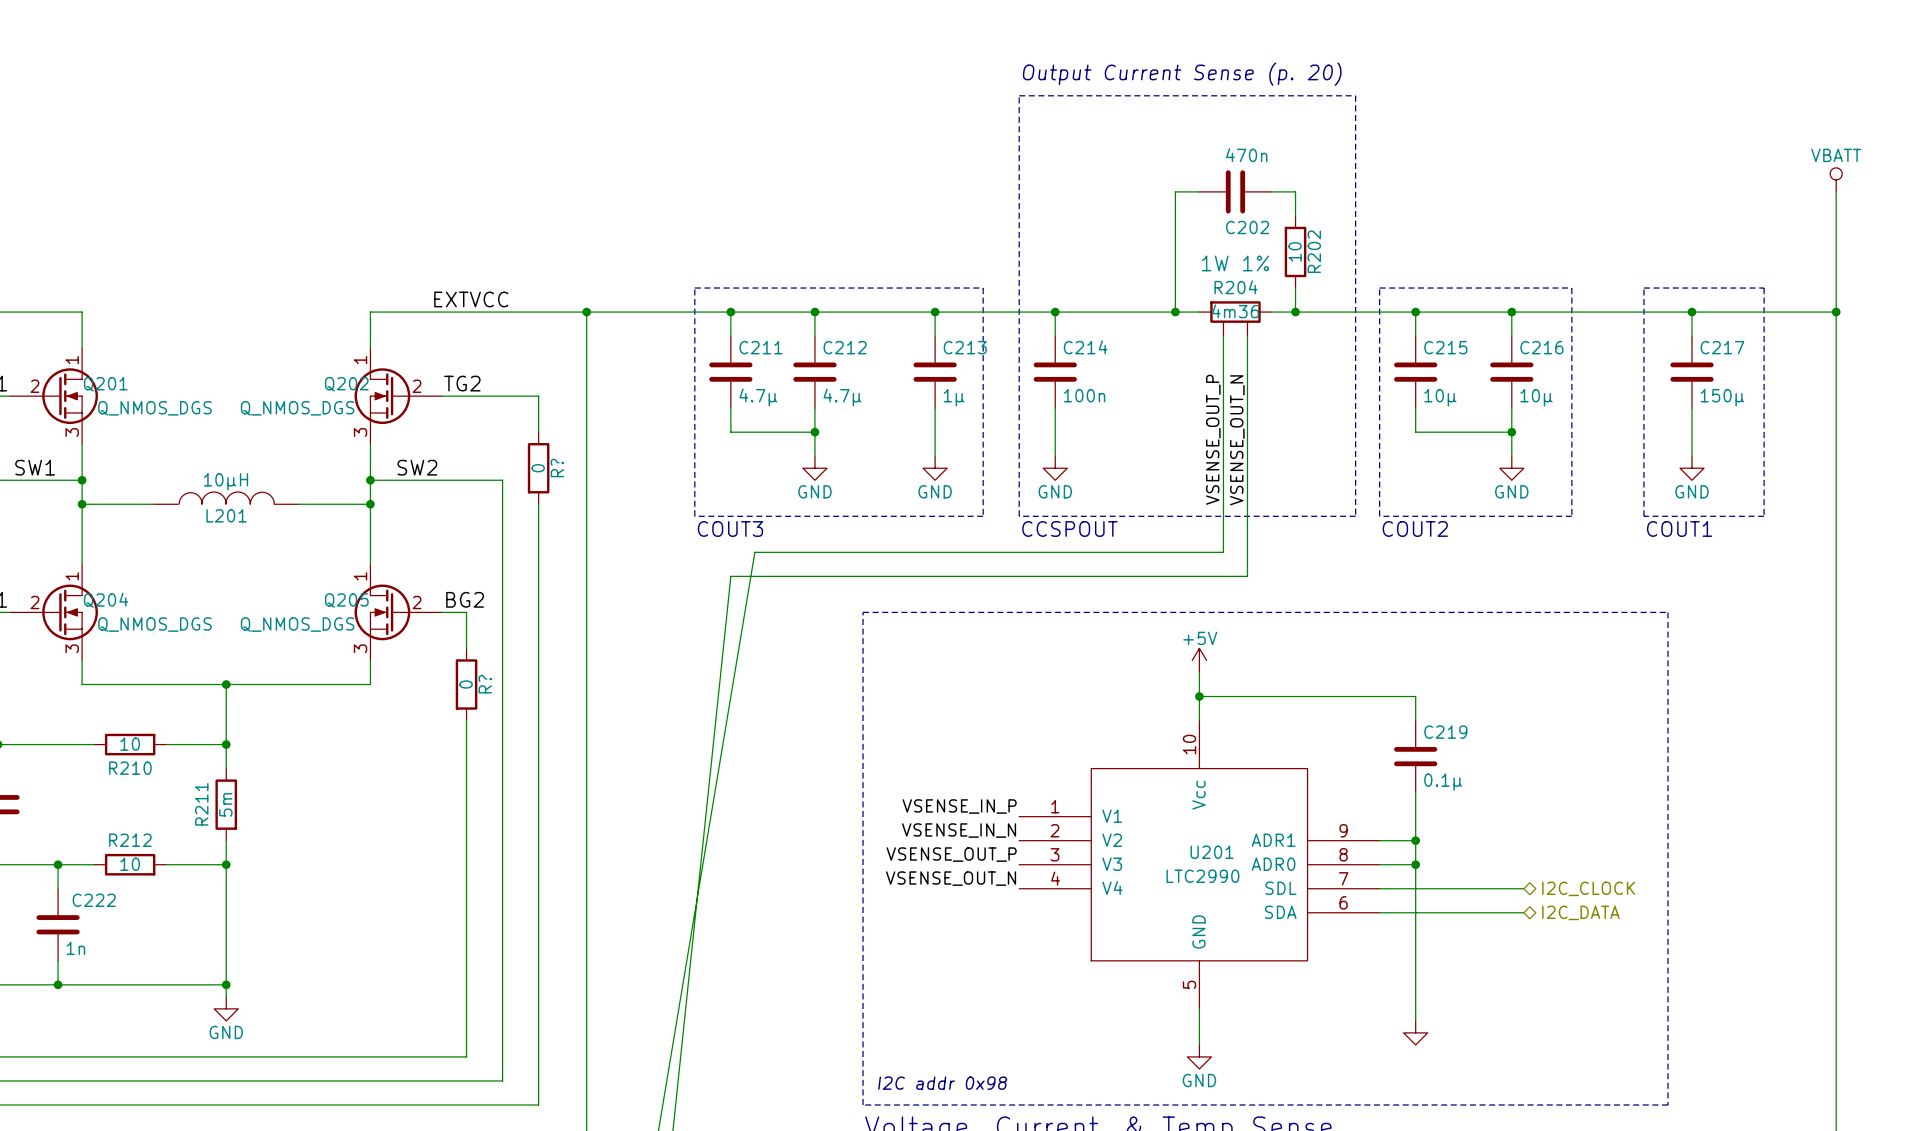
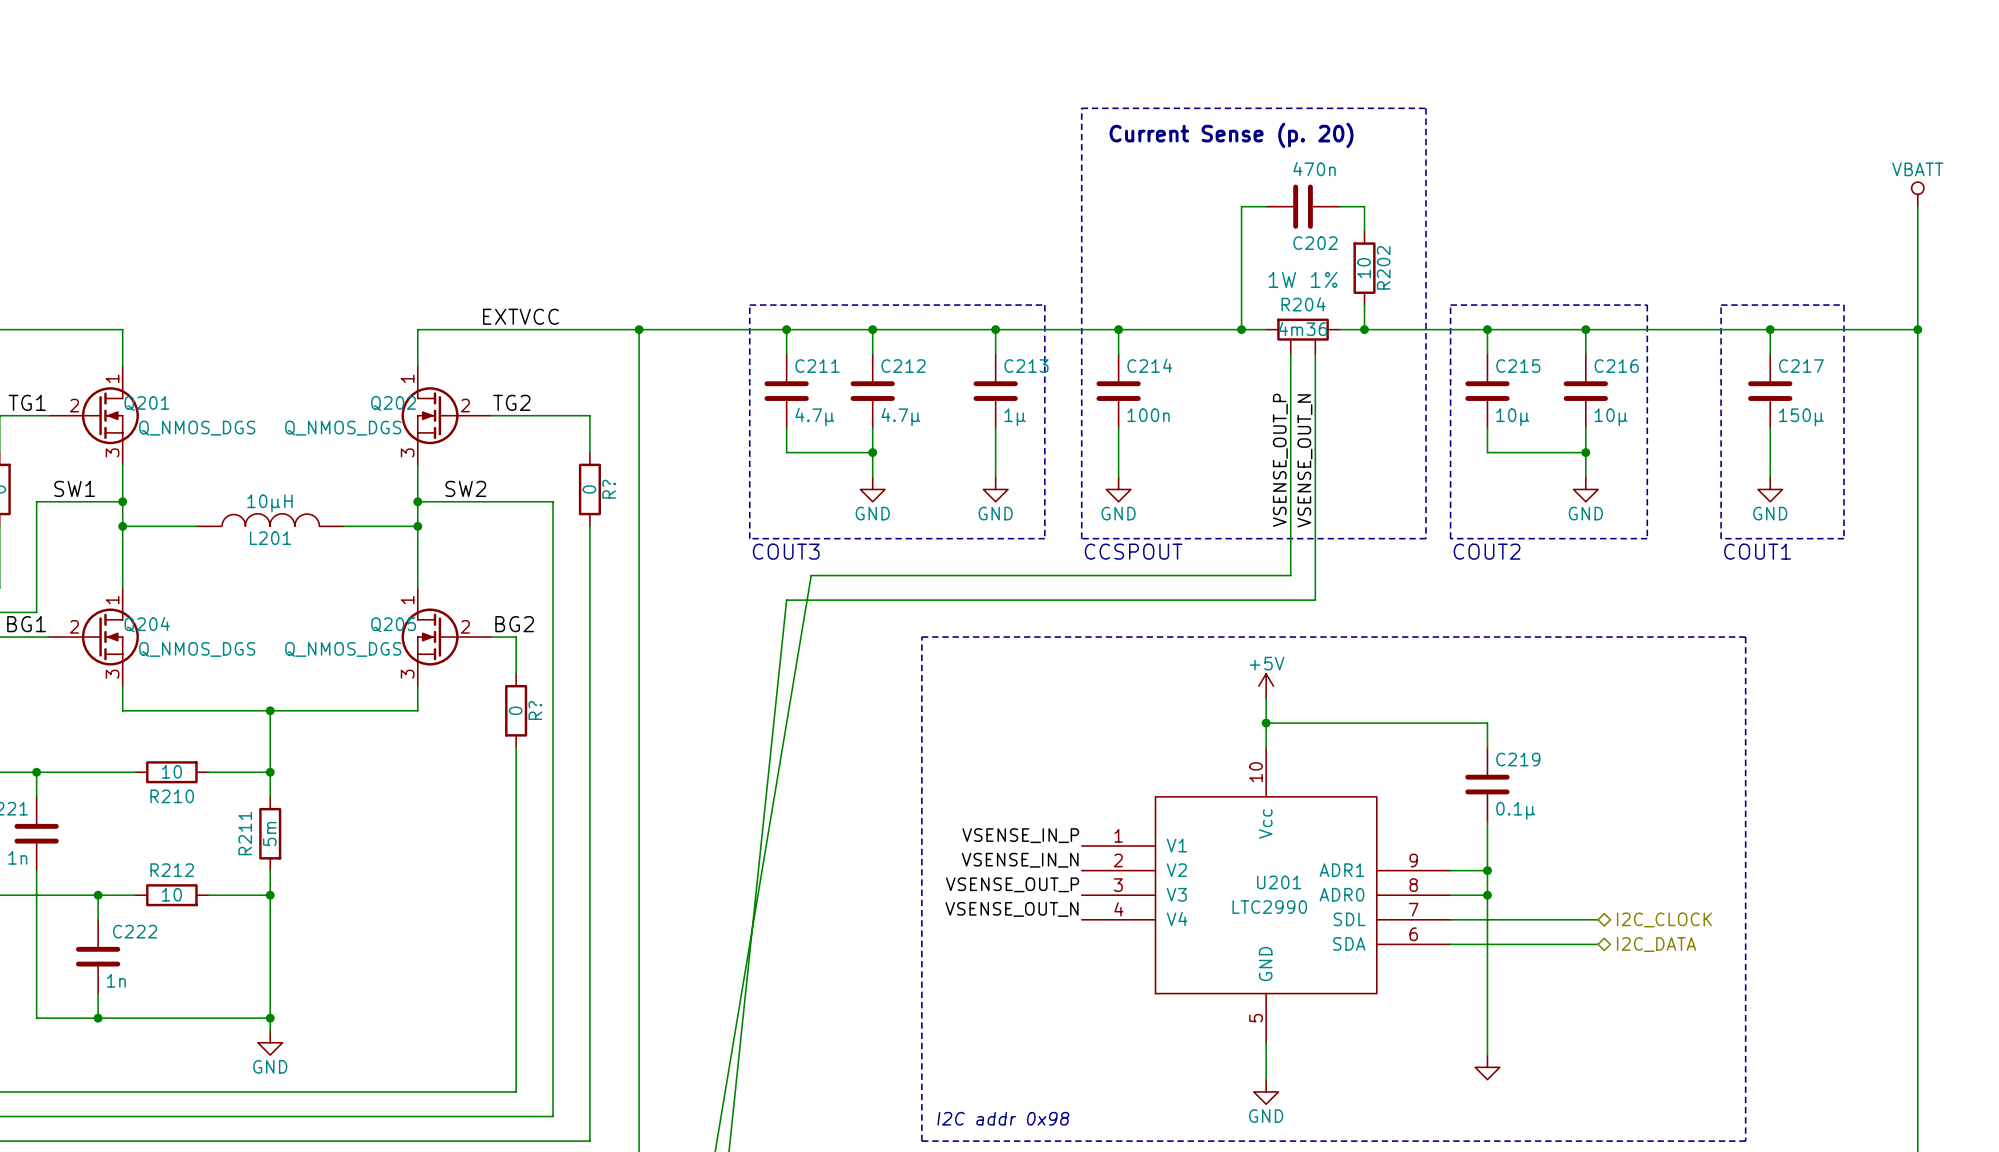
text: Output Current Sense (p. 20) (1182, 74) -> none
text: none -> Current Sense (p. 20) (1231, 135)

